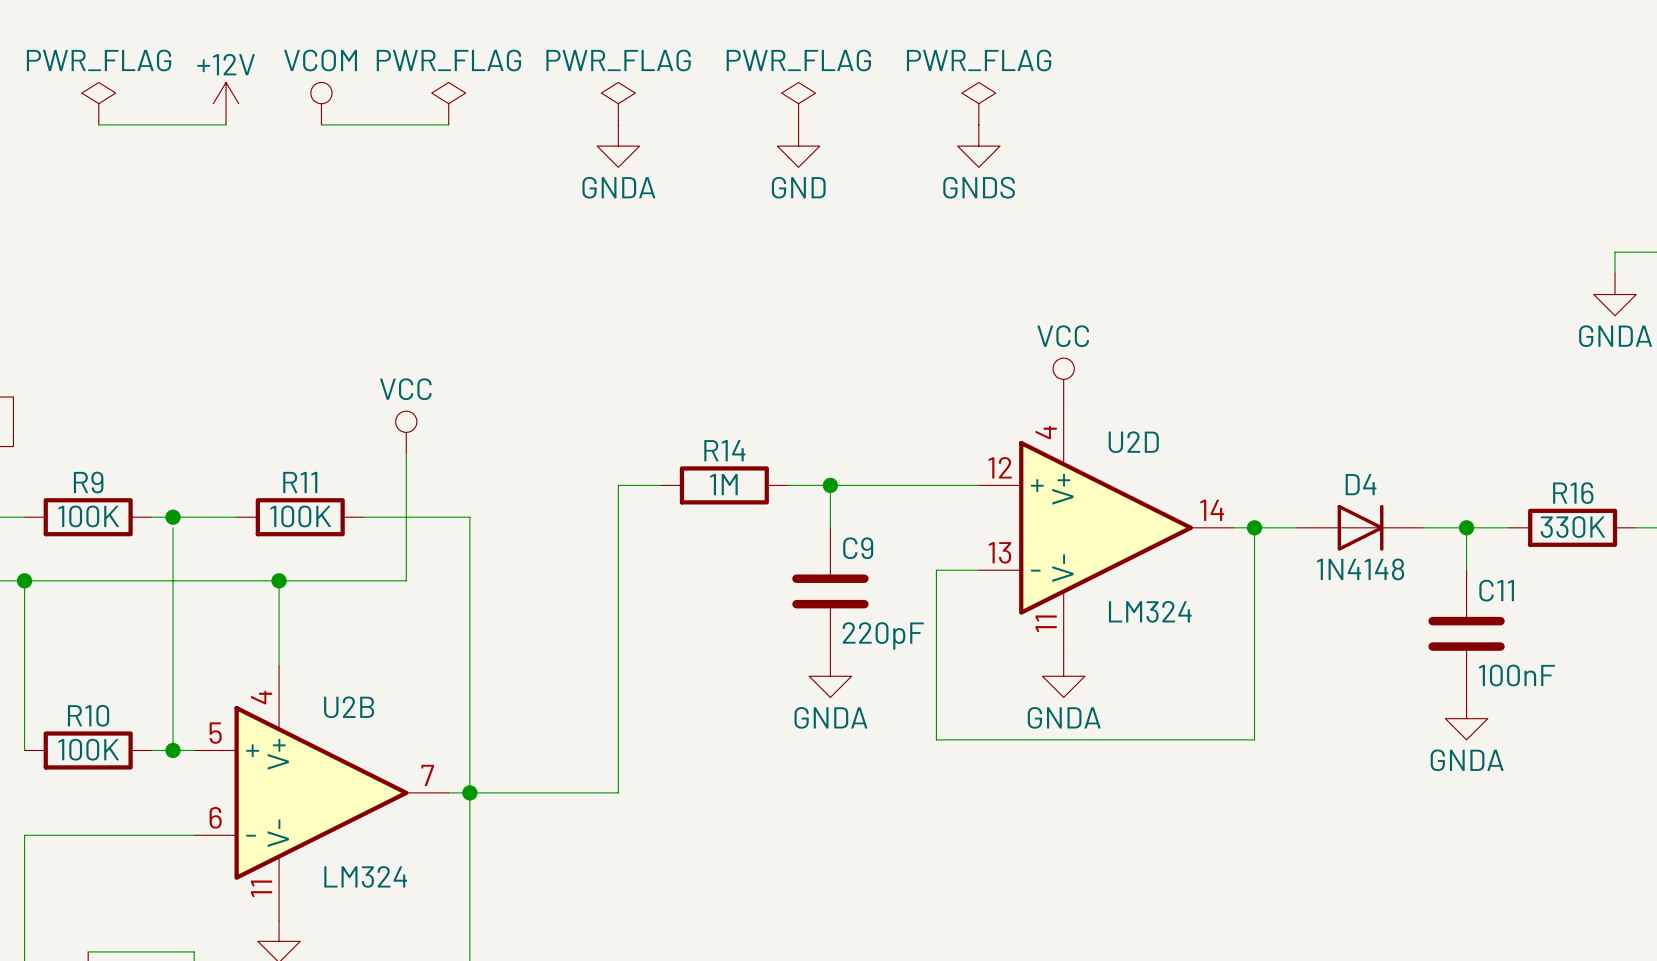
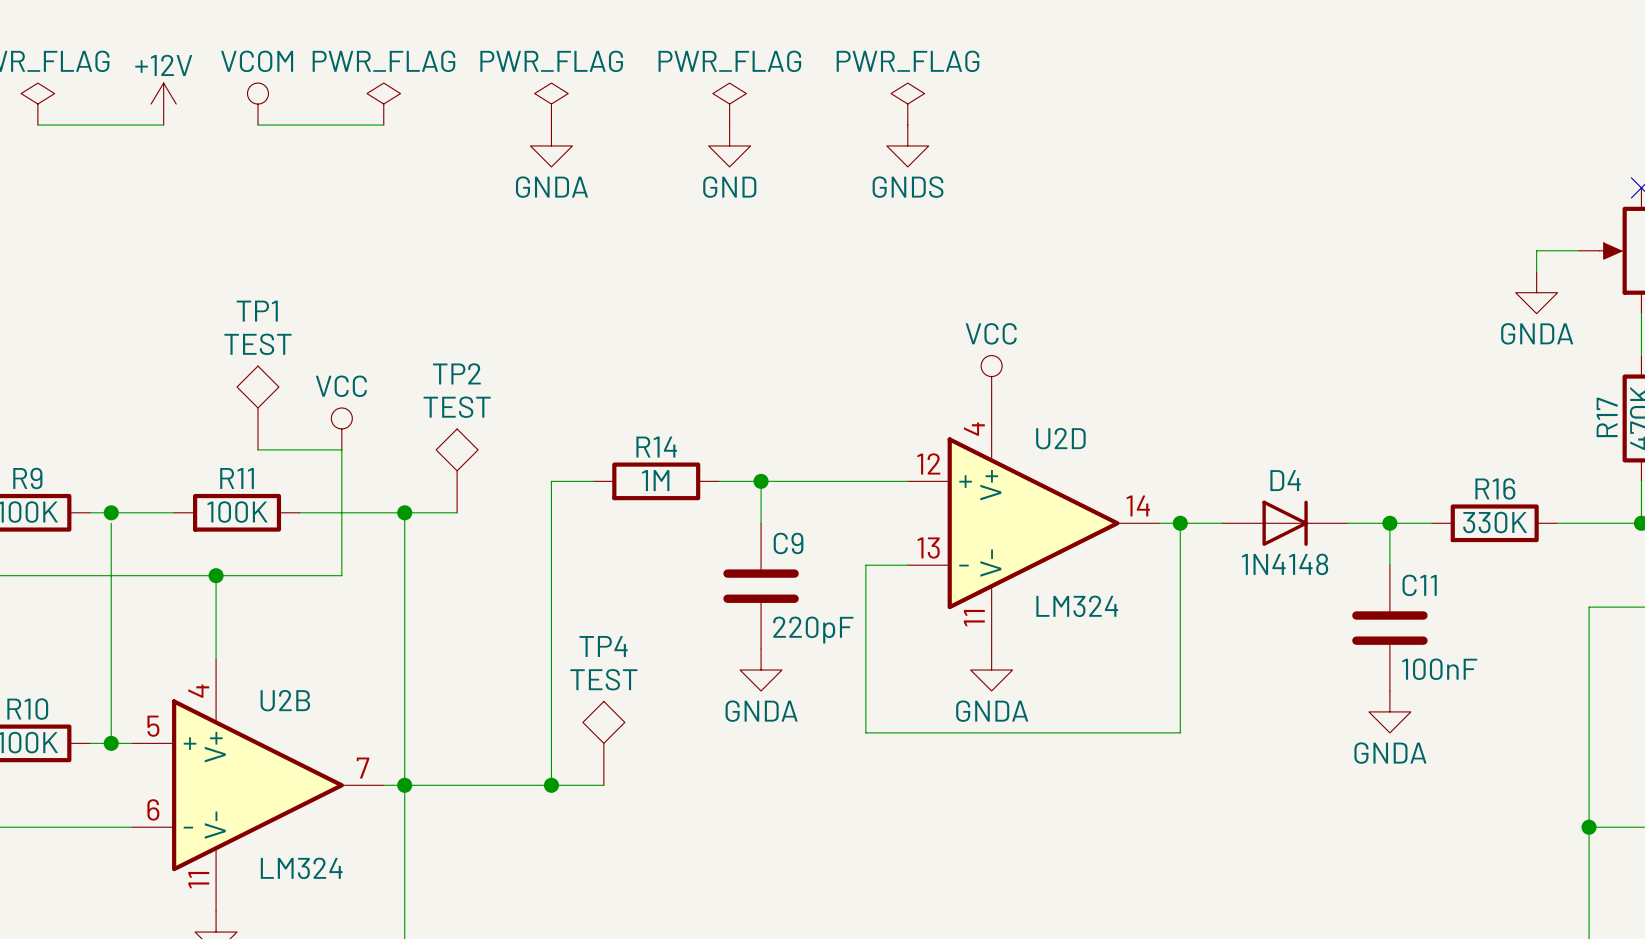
TP1: none -> TEST (257, 407)
wire: none -> (257, 449) (341, 449)
TP2: none -> TEST (457, 470)
wire: none -> (404, 512) (457, 512)
junction: none -> (404, 512)
TP4: none -> TEST (603, 743)
wire: none -> (551, 785) (603, 785)
junction: none -> (551, 785)

